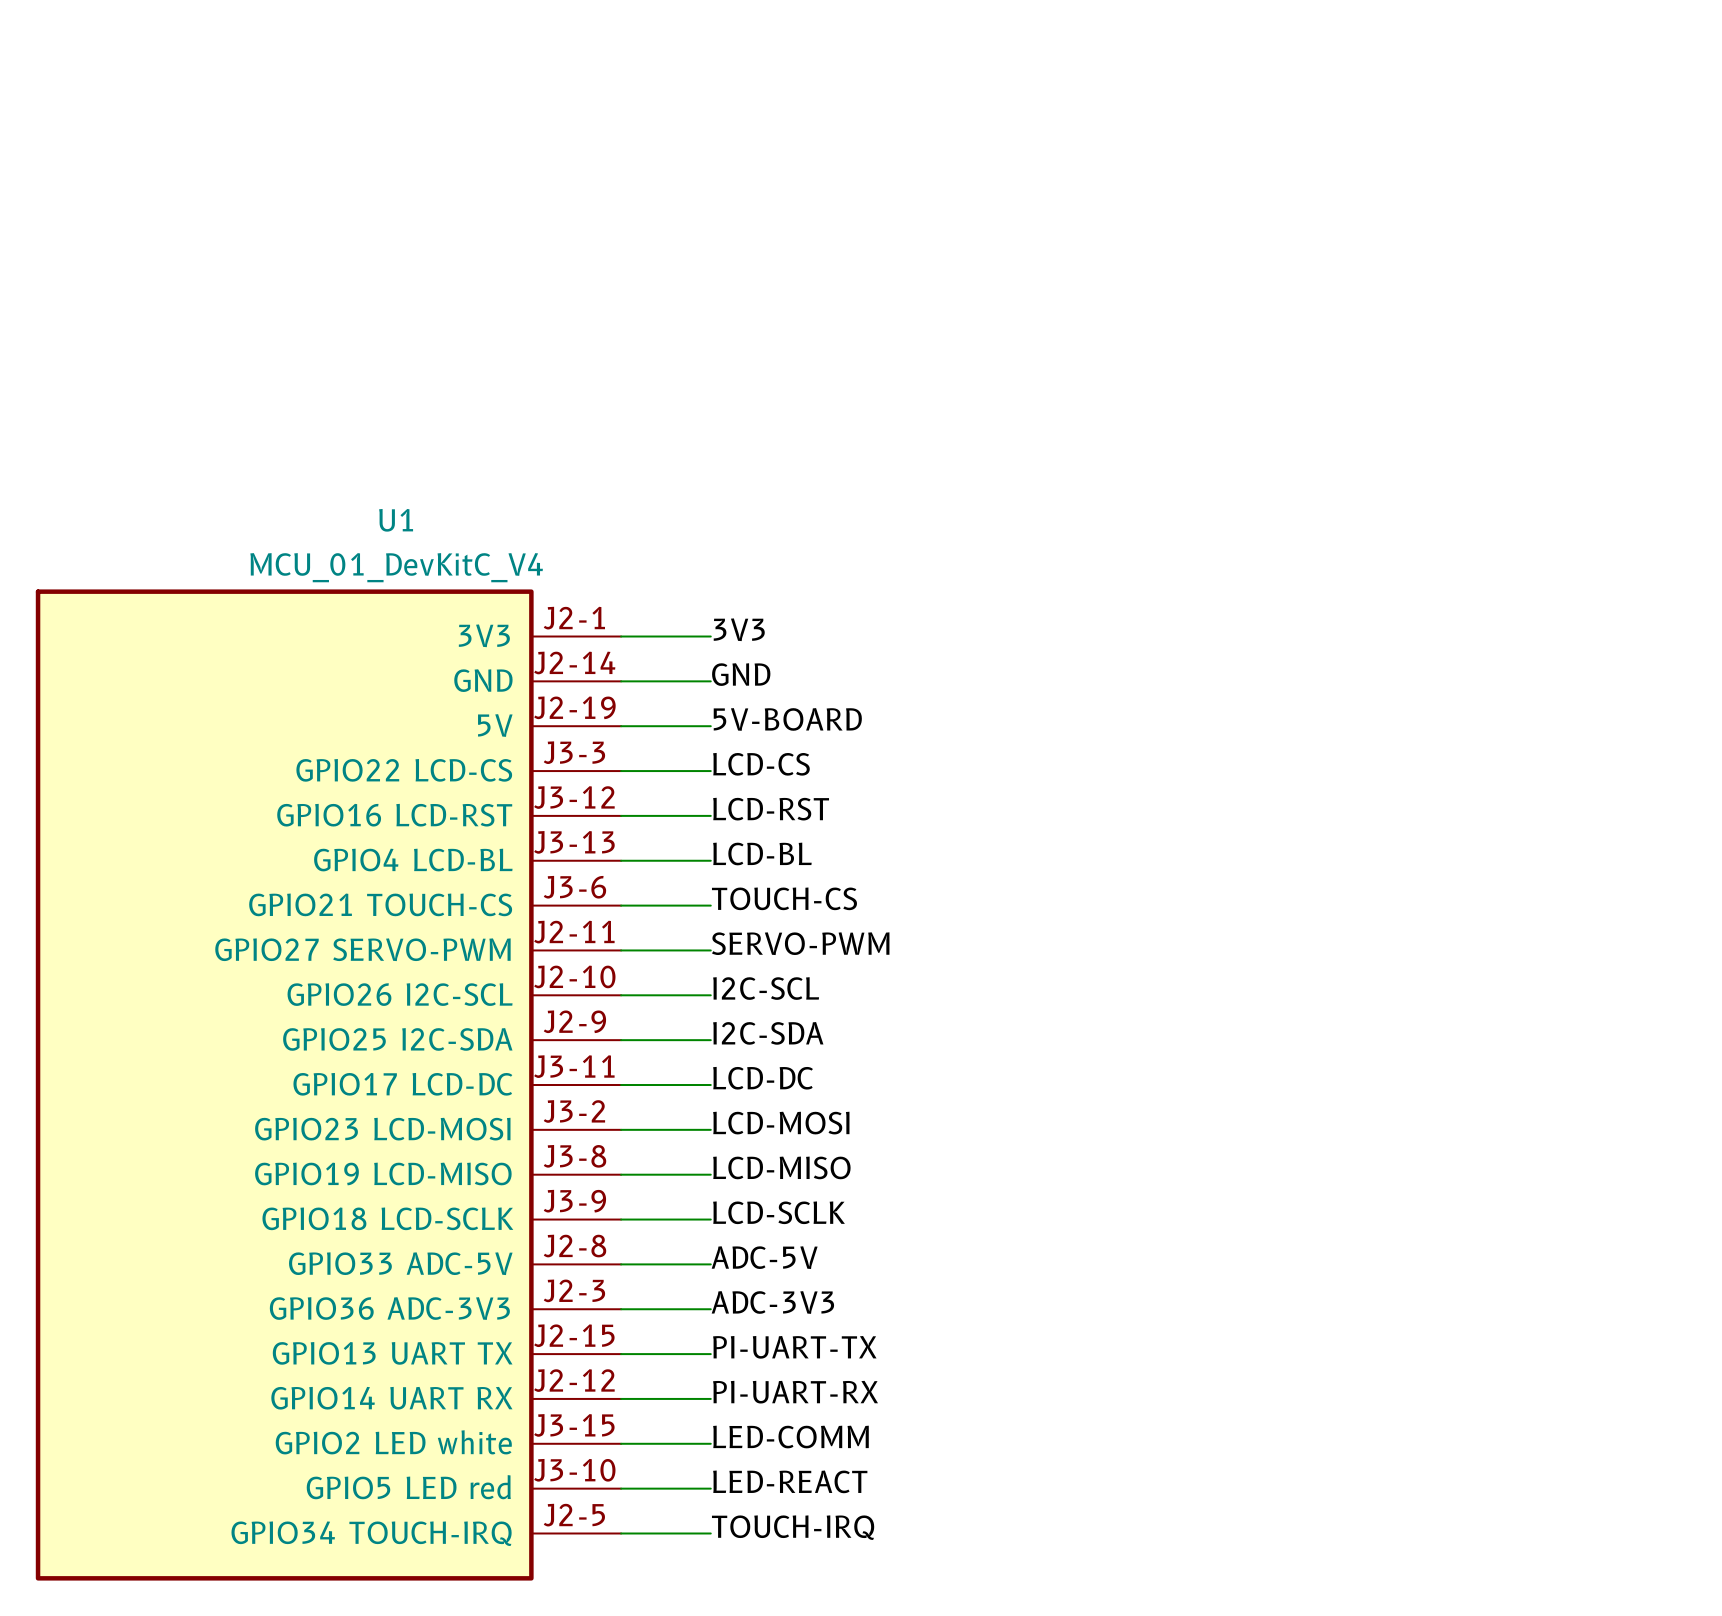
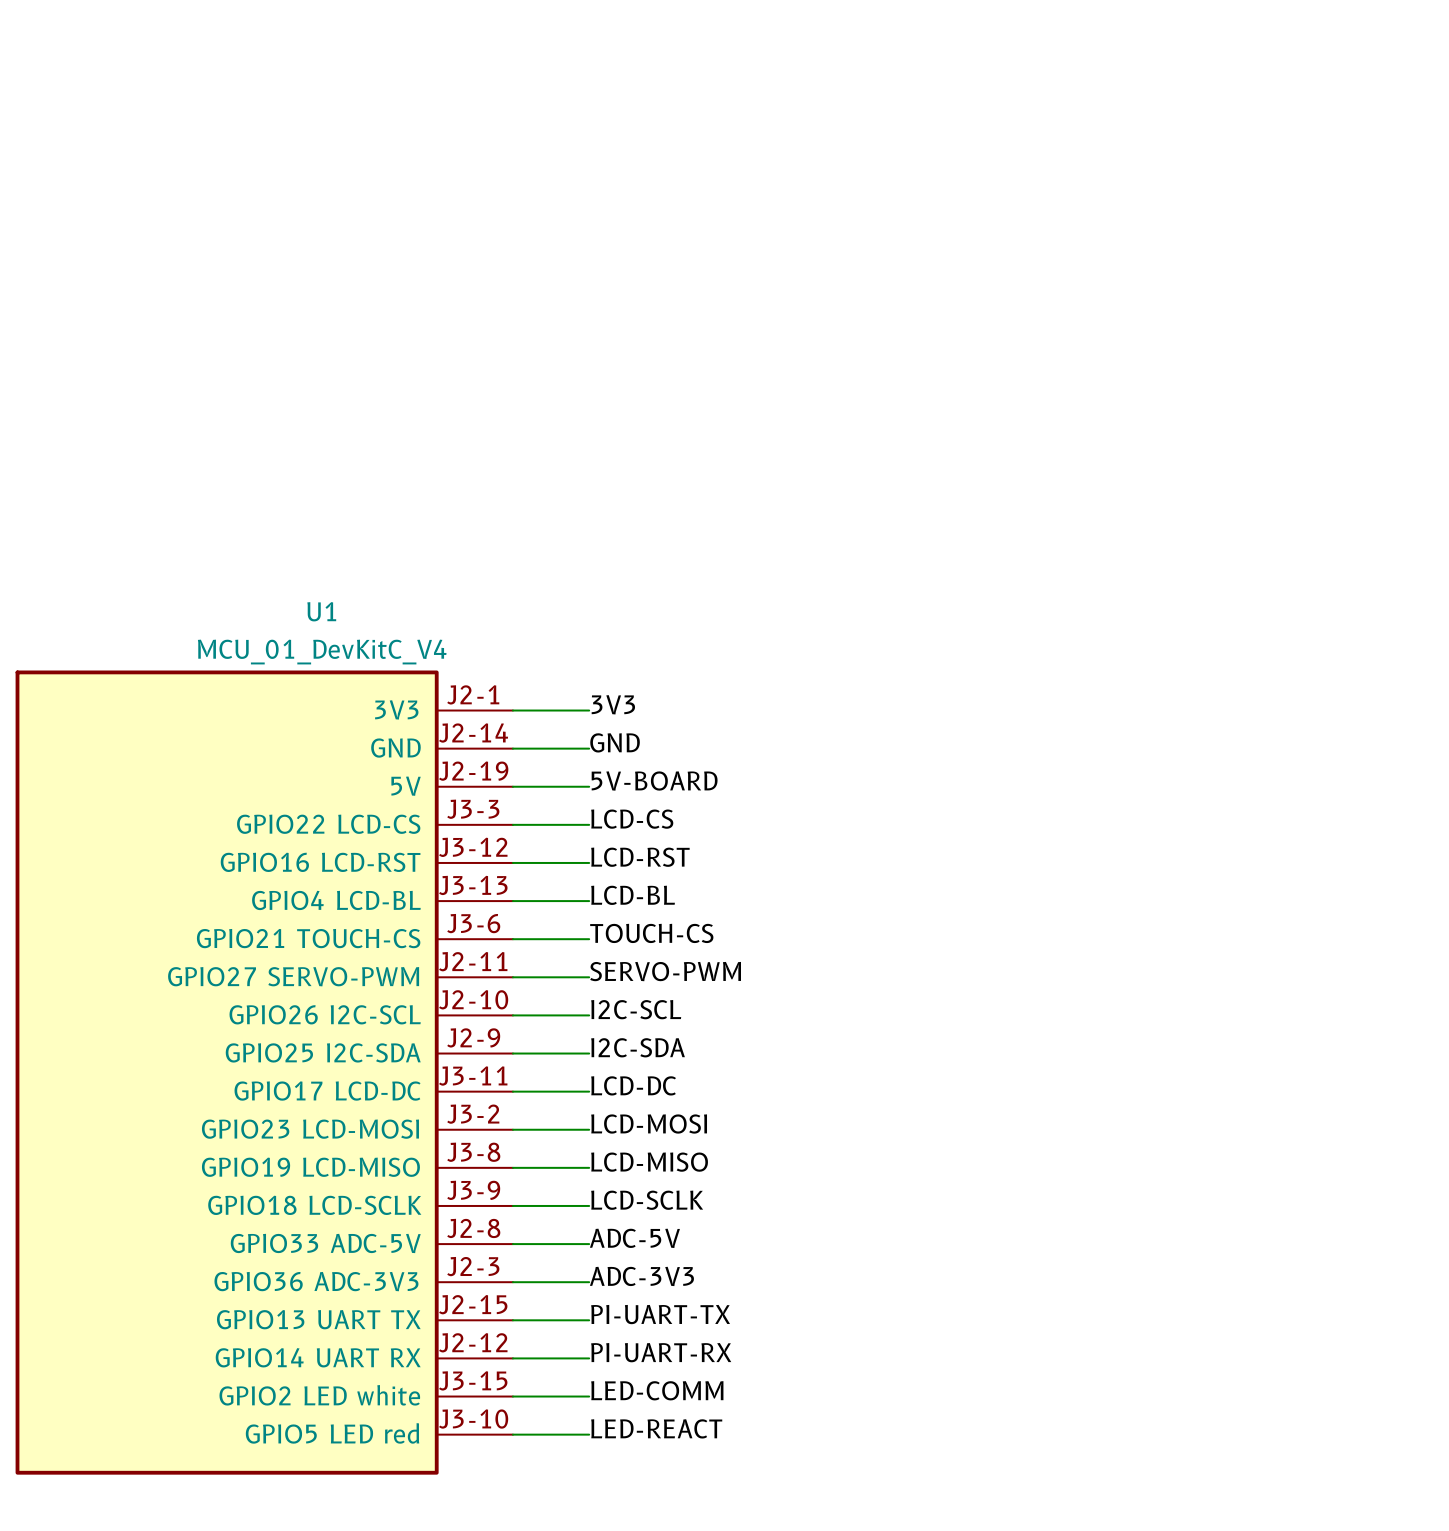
U1 symbol: [35, 589, 622, 1581] -> [15, 670, 513, 1475]
label: TOUCH-IRQ (793, 1527) -> none
wire: (621, 1533) (710, 1533) -> none

